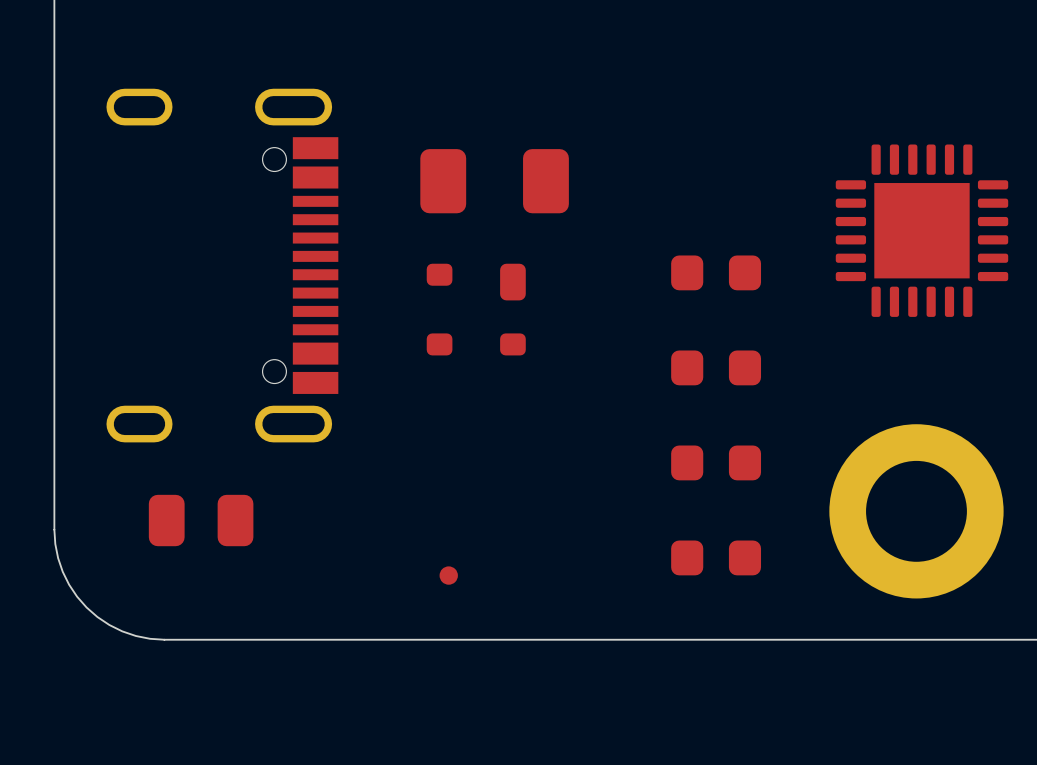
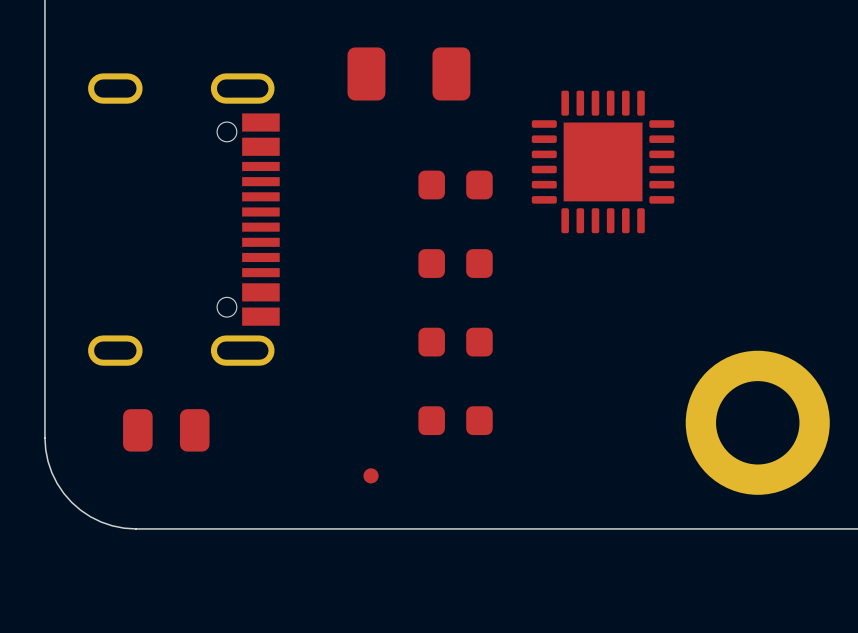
part position: (494, 181) -> (408, 73)
part: none -> (455, 184)
part position: (921, 230) -> (603, 161)
part: (716, 272) -> none
part: (476, 309) -> none
part: none -> (455, 263)
part: (716, 367) -> none
part: none -> (455, 342)
part: (716, 462) -> none
part: none -> (455, 420)
part: (716, 557) -> none

